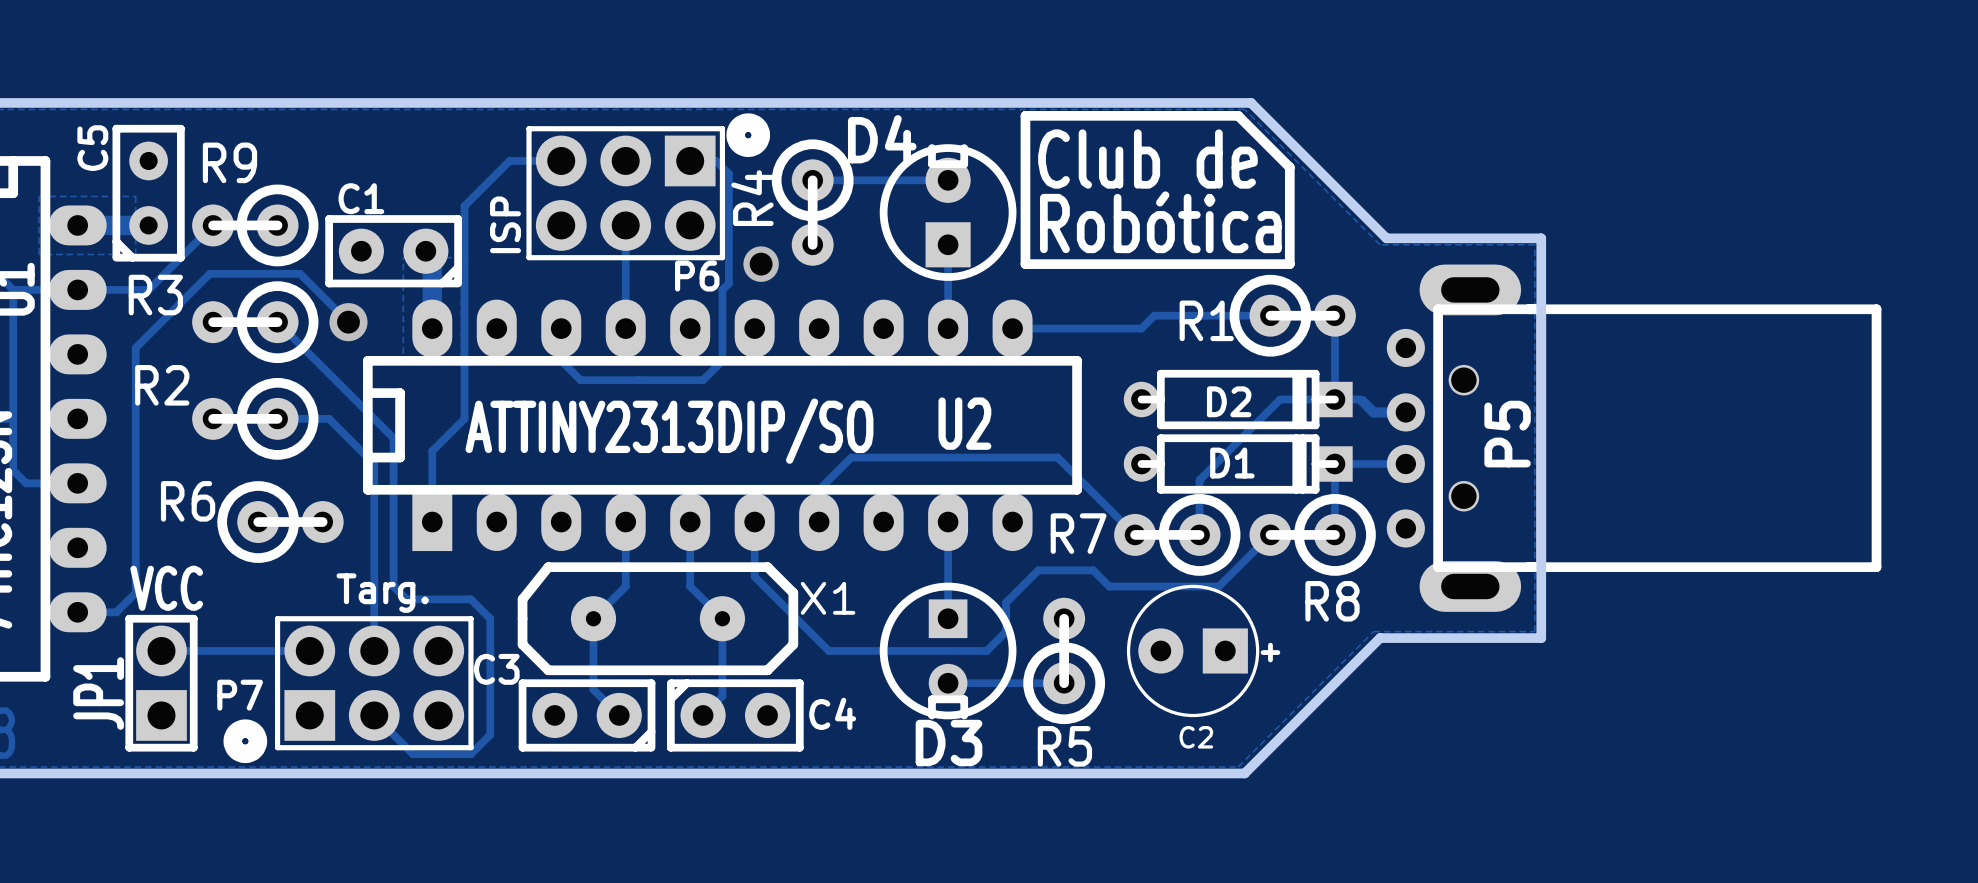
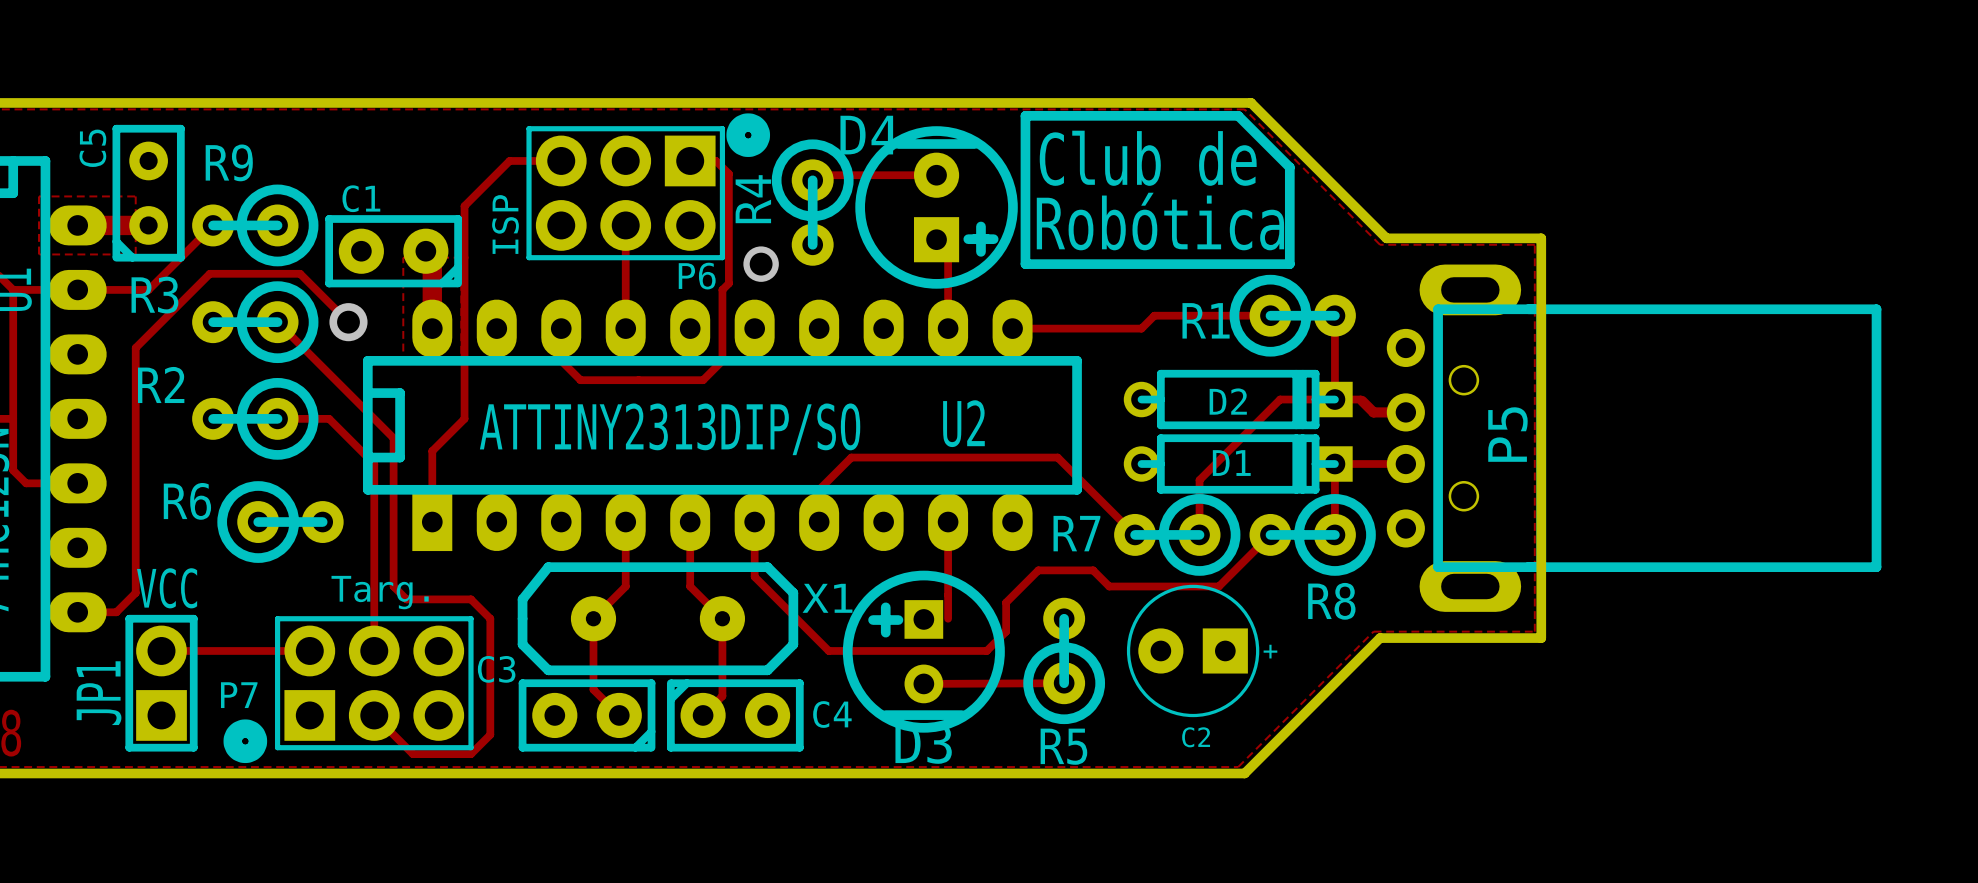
D4 footprint: [879, 144, 1017, 281] -> [855, 126, 1018, 289]
track: (812, 180) (948, 180) -> (812, 180) (817, 175) (936, 175)
D3 footprint: [879, 582, 1017, 720] -> [842, 570, 1005, 733]
track: (948, 683) (1064, 683) -> (923, 683) (1064, 683)

